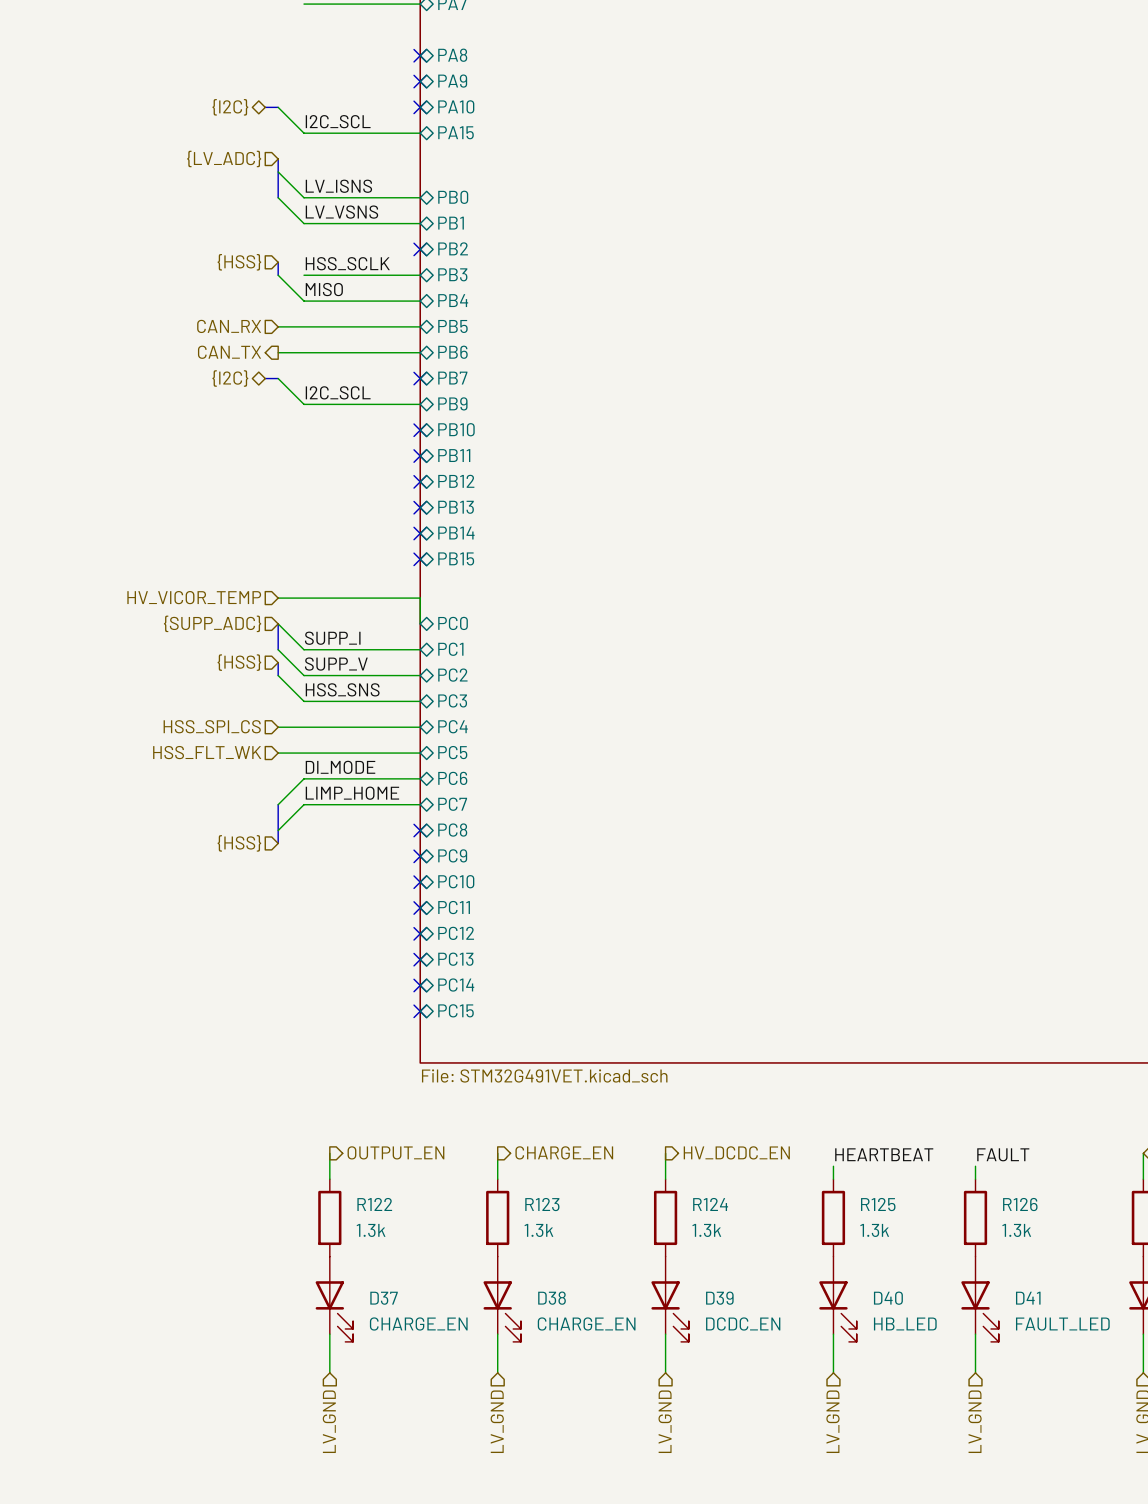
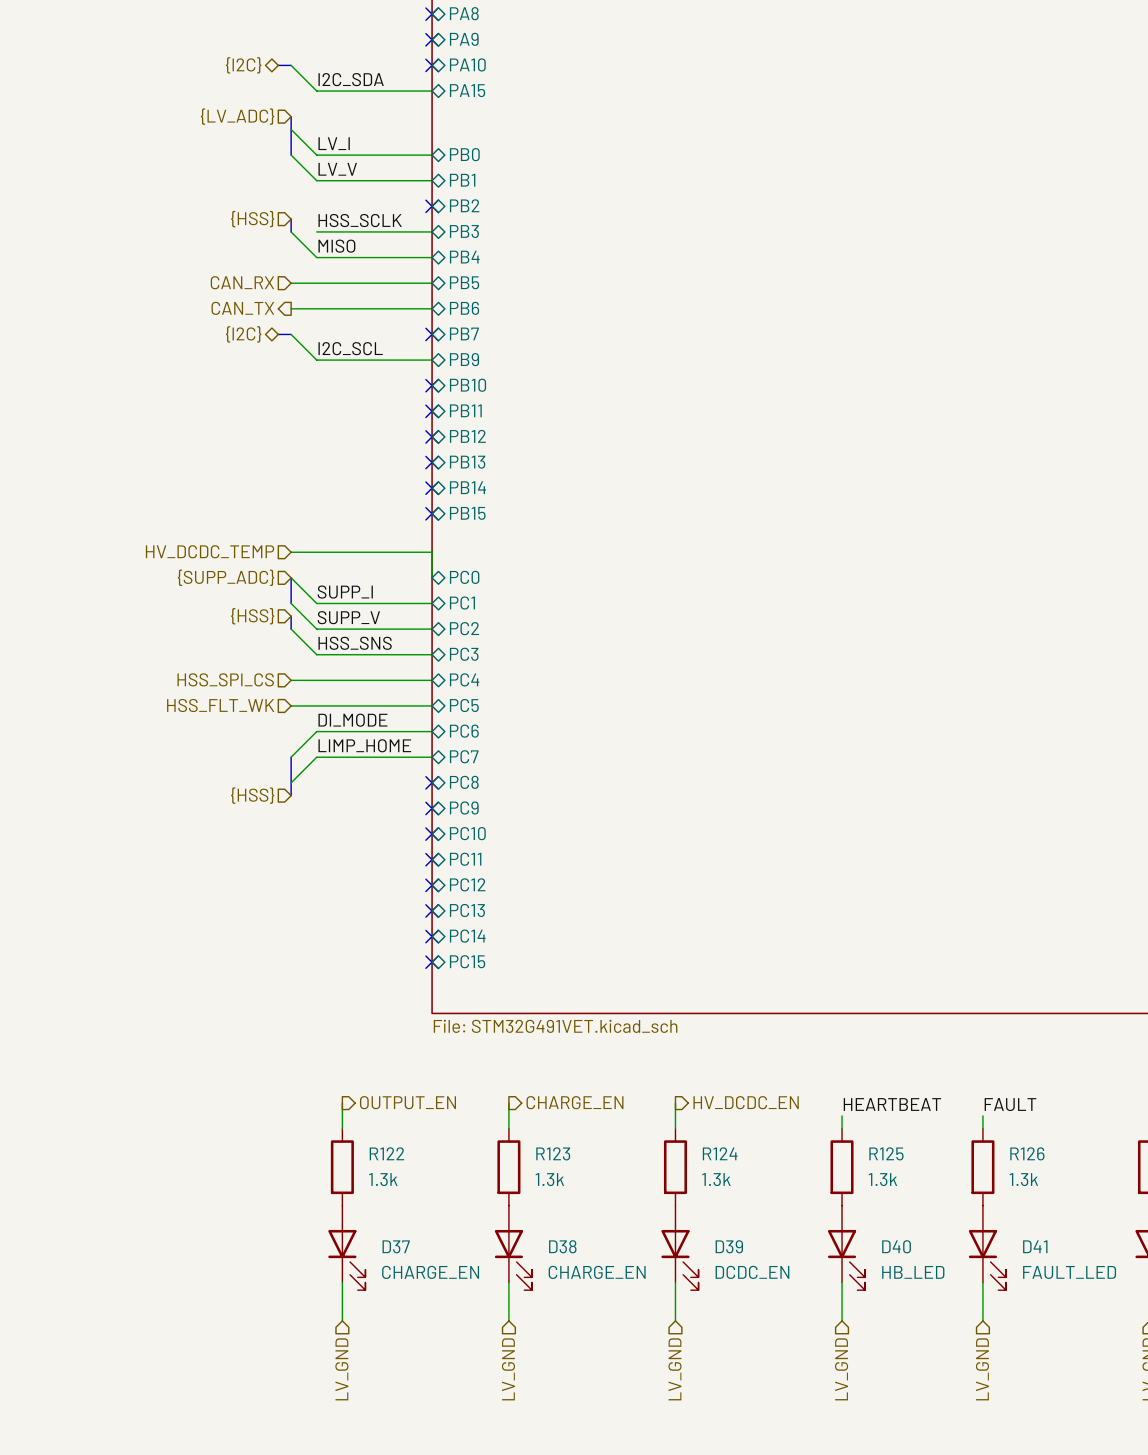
label: I2C_SCL (338, 121) -> I2C_SDA (351, 79)
label: LV_ISNS (338, 186) -> LV_I (334, 143)
label: LV_VSNS (341, 212) -> LV_V (337, 169)
hierarchical label: HV_VICOR_TEMP (194, 597) -> HV_DCDC_TEMP (210, 551)

